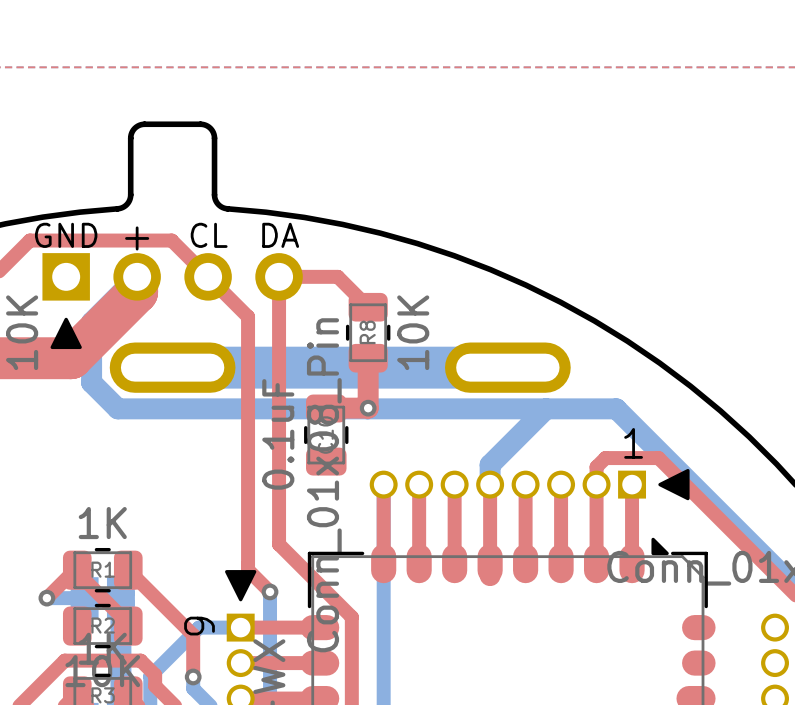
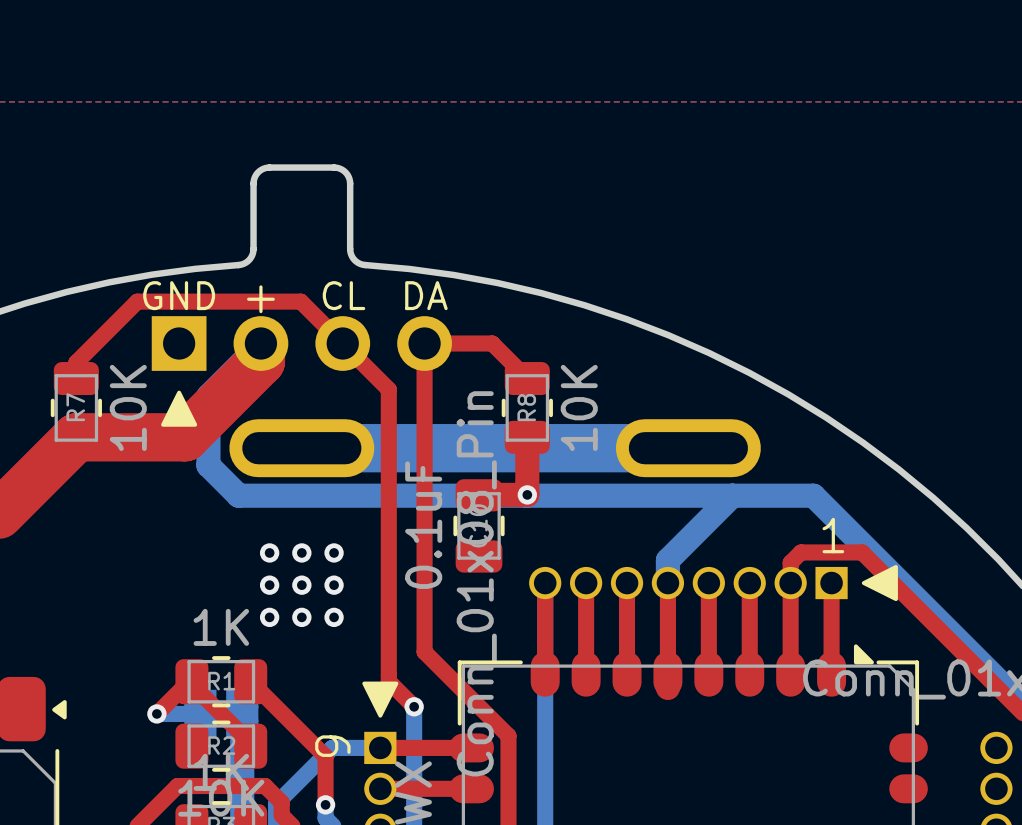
via: none -> (269, 552)
via: none -> (301, 552)
via: none -> (334, 552)
via: none -> (269, 585)
via: none -> (301, 585)
via: none -> (334, 585)
via: none -> (269, 617)
via: none -> (301, 617)
via: none -> (334, 617)

